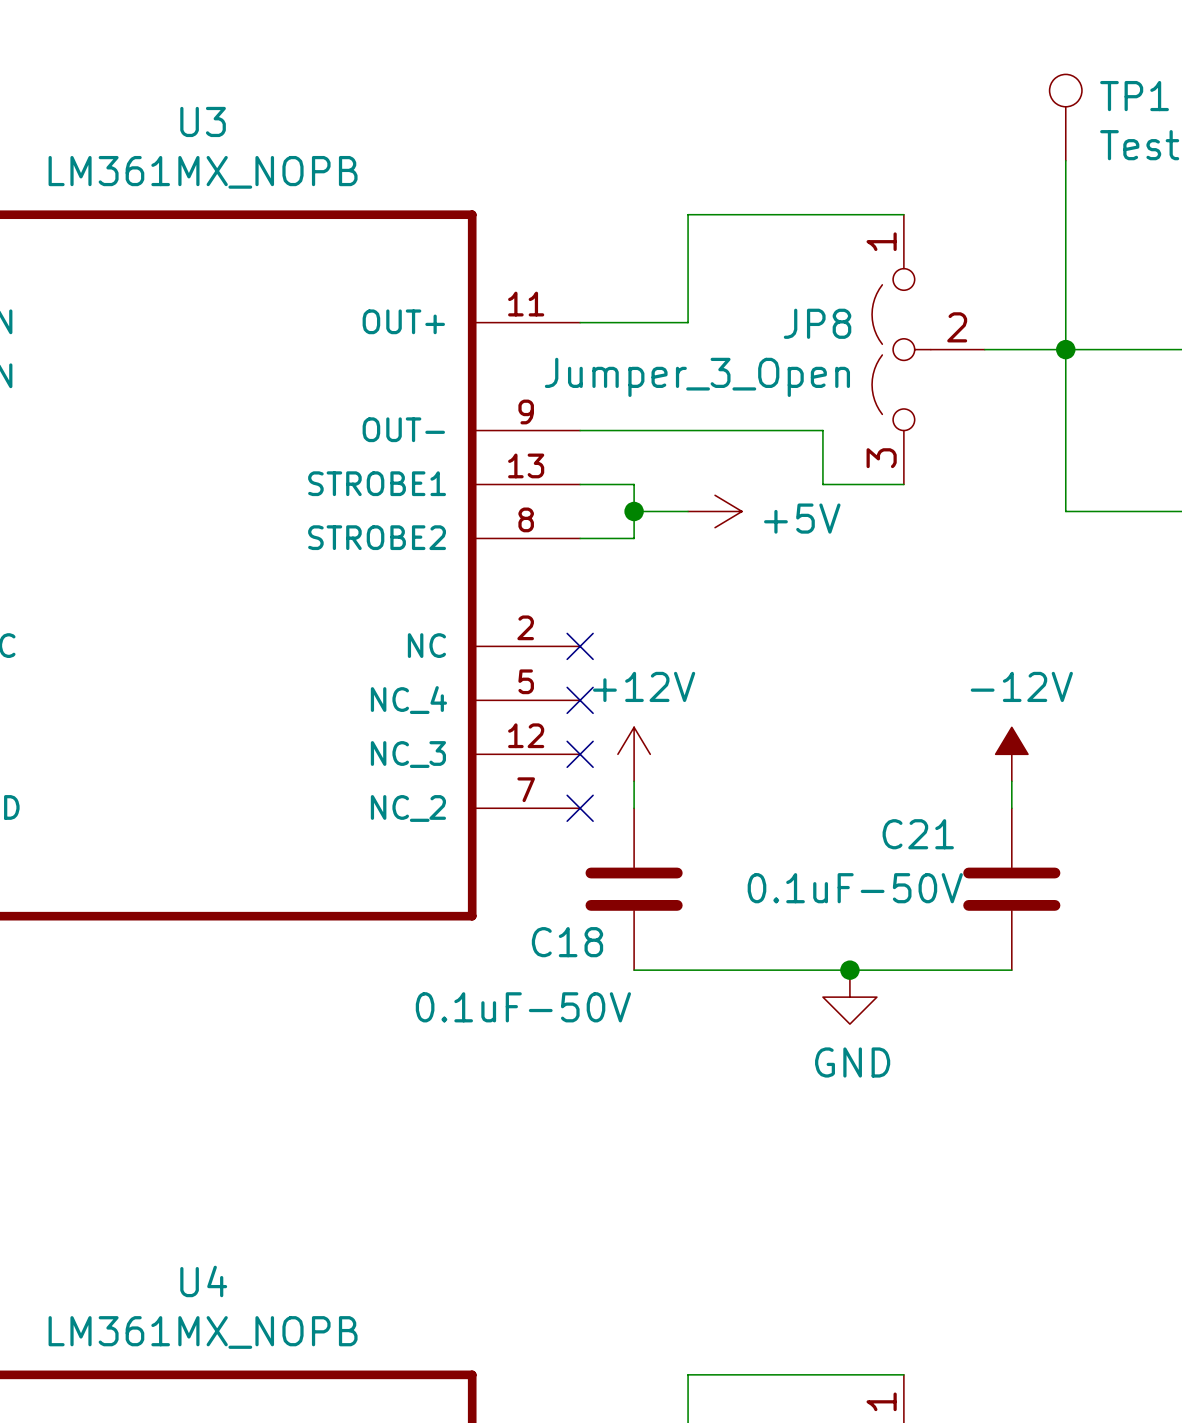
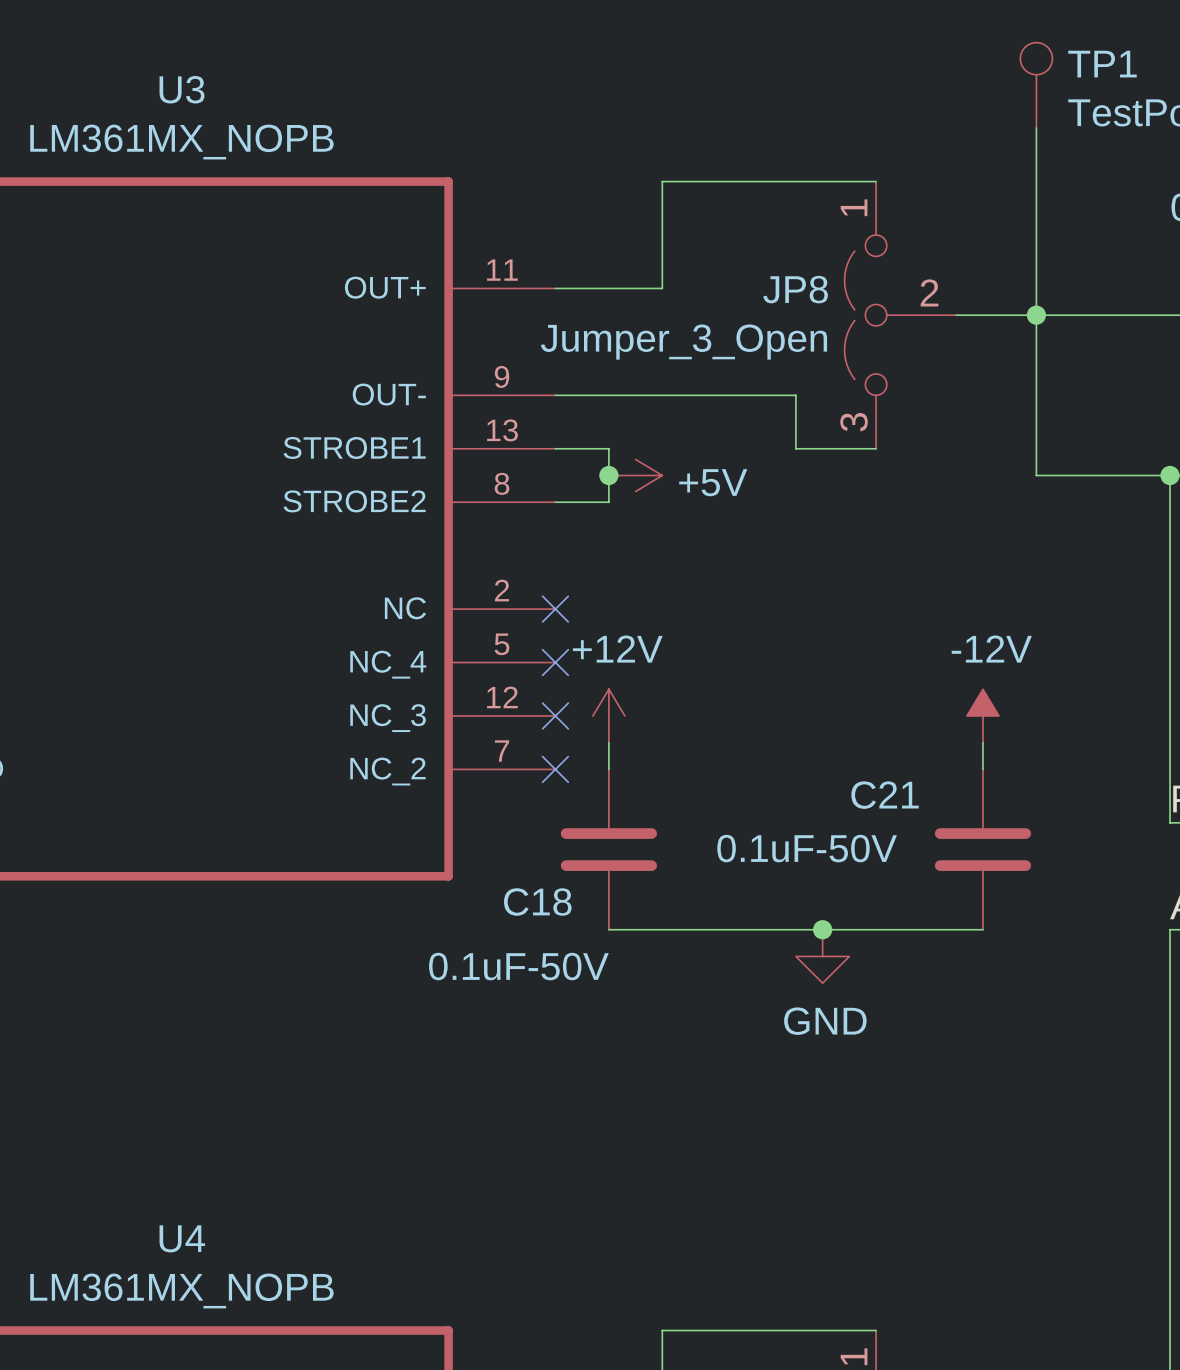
power symbol position: +5V (715, 511) -> +5V (635, 475)

